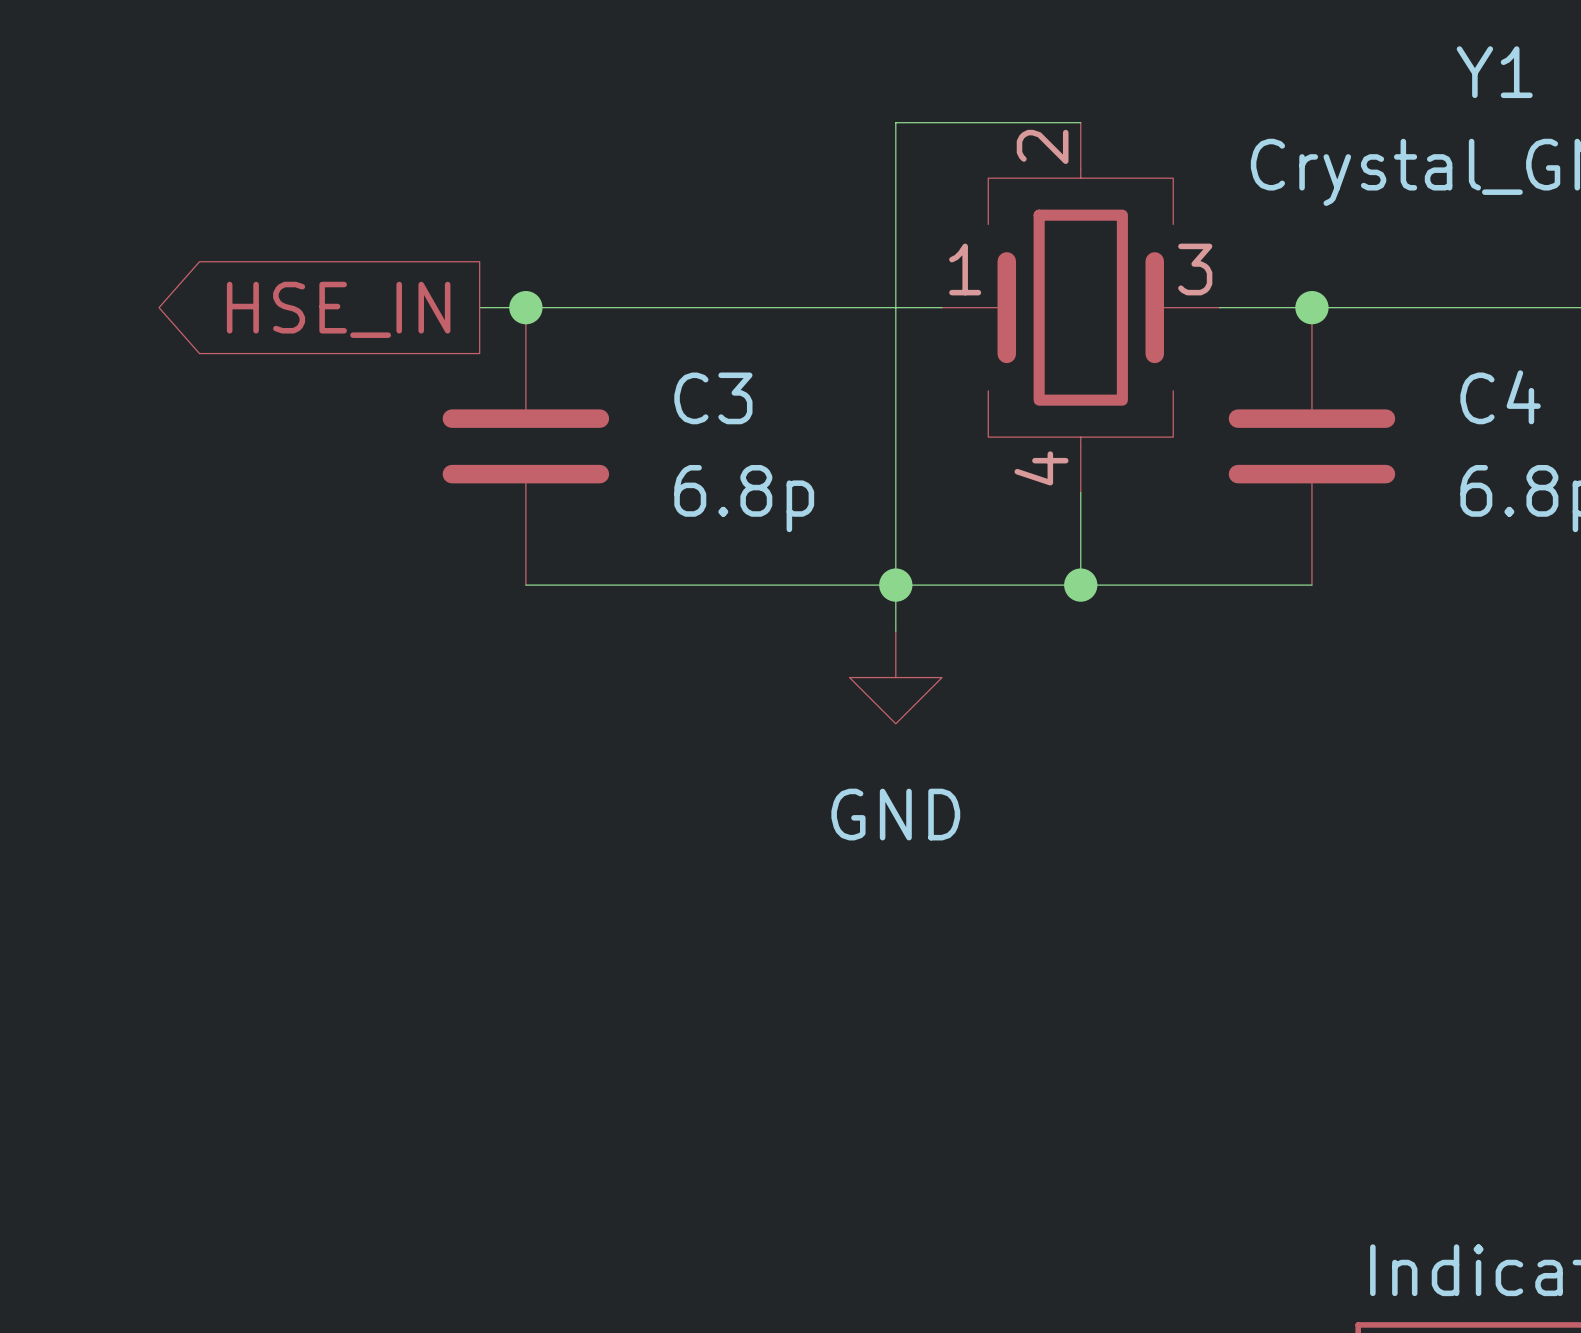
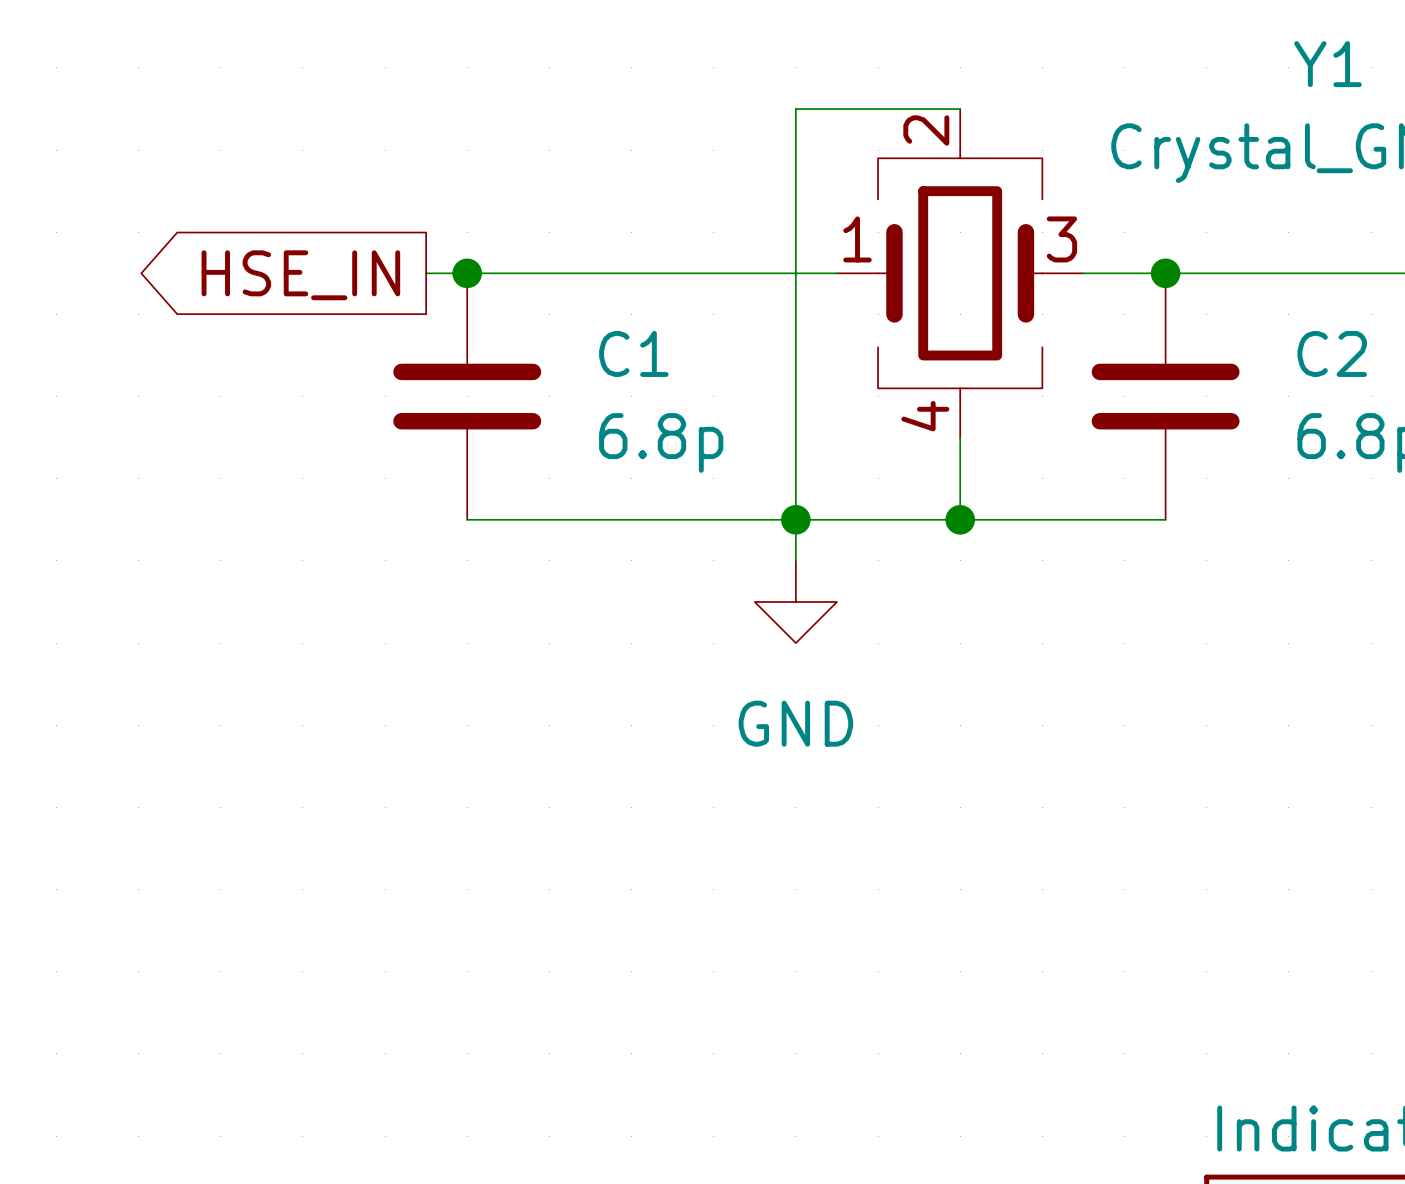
C4 name: C4 (1500, 397) -> C2 (1332, 353)
C3 name: C3 (713, 398) -> C1 (633, 353)

